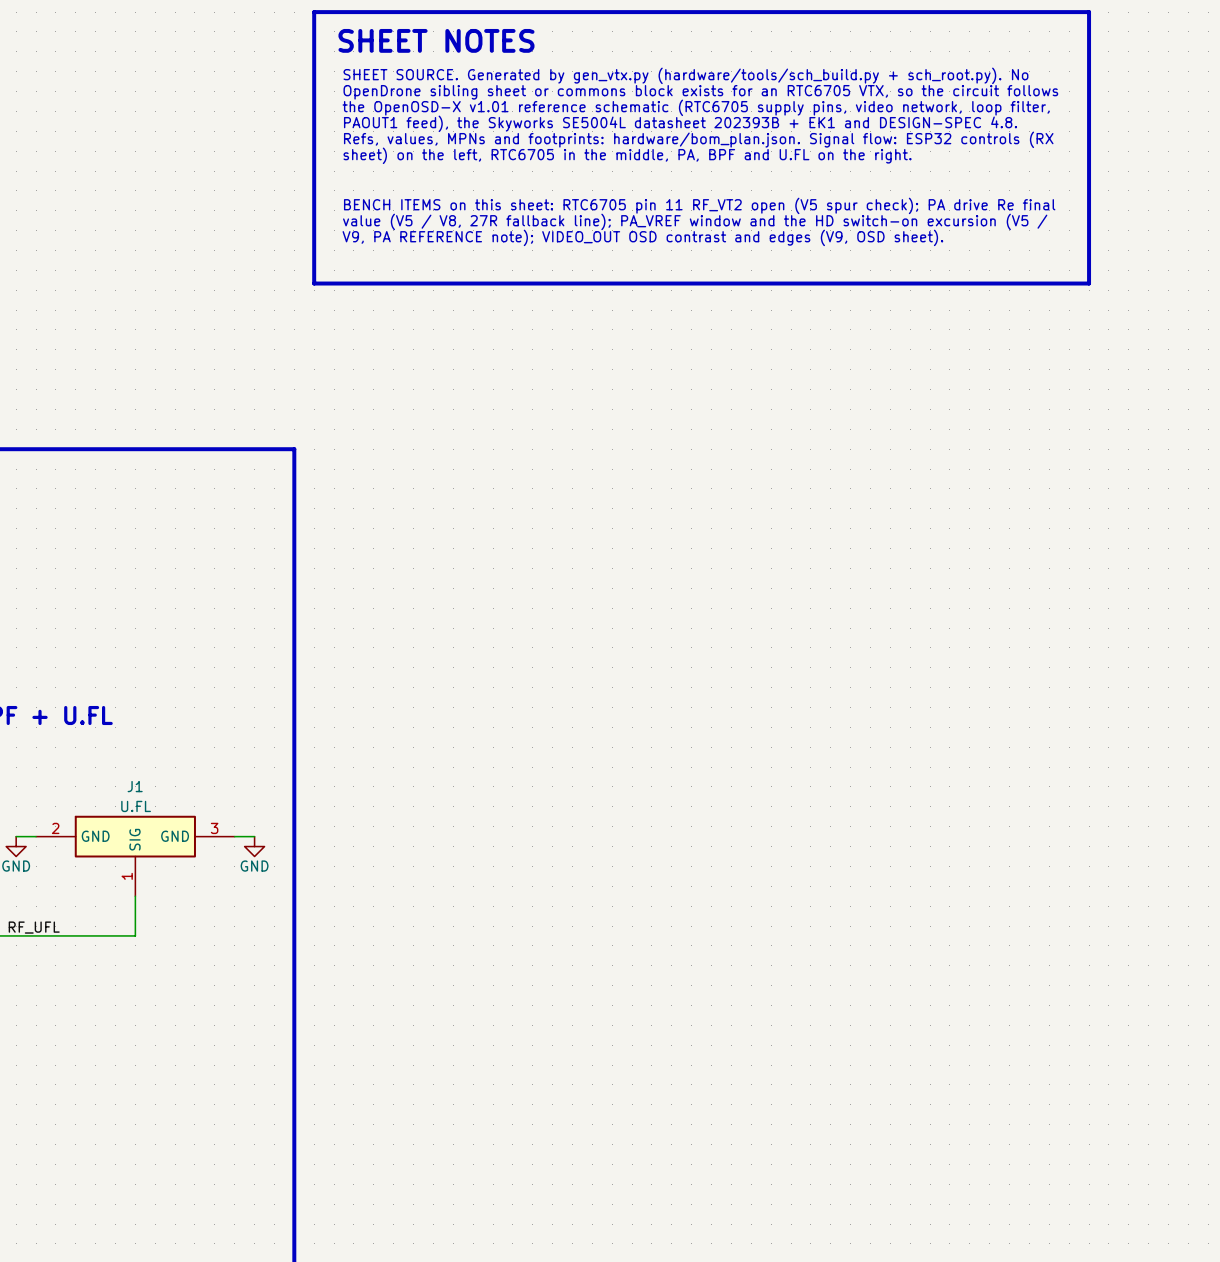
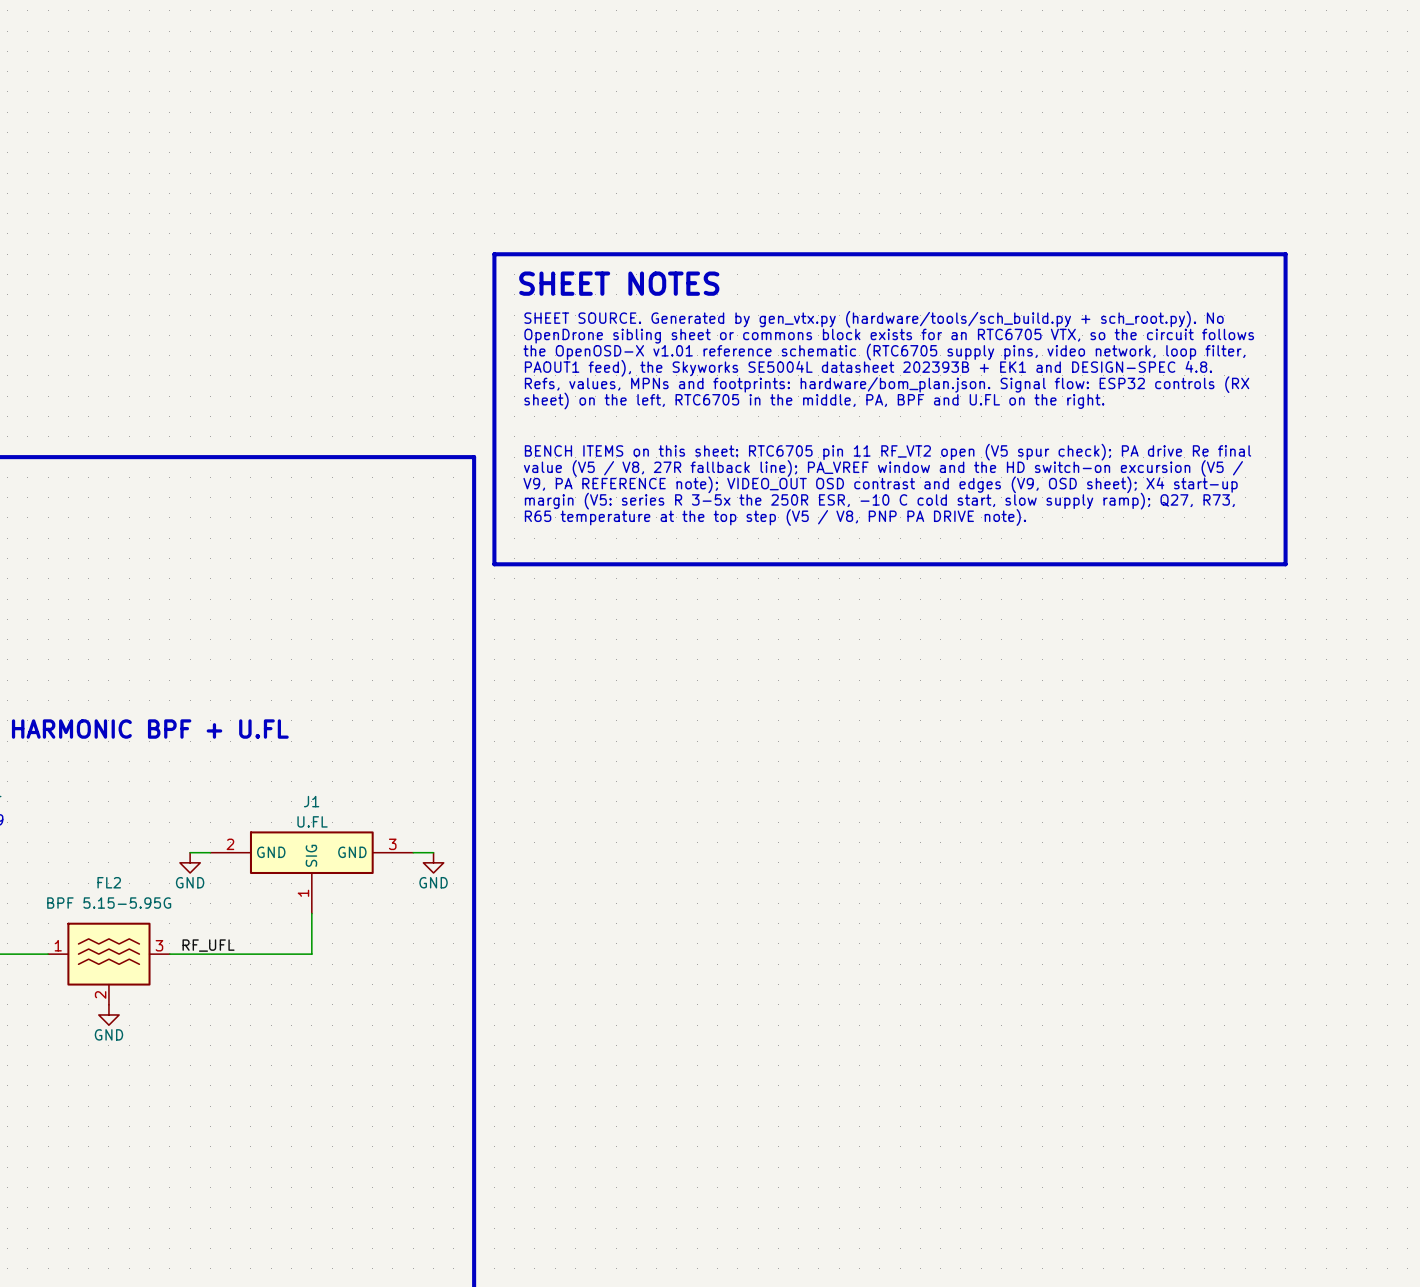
text: SHEET NOTES (436, 40) -> none
text: SHEET SOURCE. Generated by gen_vtx.py (hardware/tools/sch_build.py + sch_root.py). No (685, 75) -> none
text: OpenDrone sibling sheet or commons block exists for an RTC6705 VTX, so the circuit follows (700, 92) -> none
text: the OpenOSD-X v1.01 reference schematic (RTC6705 supply pins, video network, loop filter, (696, 107) -> none
text: PAOUT1 feed), the Skyworks SE5004L datasheet 202393B + EK1 and DESIGN-SPEC 4.8. (680, 123) -> none
text: Refs, values, MPNs and footprints: hardware/bom_plan.json. Signal flow: ESP32 controls (RX (698, 139) -> none
text: sheet) on the left, RTC6705 in the middle, PA, BPF and U.FL on the right. (627, 155) -> none
text: BENCH ITEMS on this sheet: RTC6705 pin 11 RF_VT2 open (V5 spur check); PA drive Re final (699, 205) -> none
text: value (V5 / V8, 27R fallback line); PA_VREF window and the HD switch-on excursion (V5 / (695, 221) -> none
text: V9, PA REFERENCE note); VIDEO_OUT OSD contrast and edges (V9, OSD sheet). (642, 237) -> none
line: (314, 250) (314, 12) (1089, 12) (1089, 250) -> (494, 254) (1285, 254)
text: none -> SHEET NOTES (619, 283)
line: (314, 283) (1089, 283) -> (494, 287) (494, 564) (1285, 564) (1285, 287)
text: none -> SHEET SOURCE. Generated by gen_vtx.py (hardware/tools/sch_build.py + sch_root.py). No (874, 319)
text: none -> OpenDrone sibling sheet or commons block exists for an RTC6705 VTX, so the circuit follows (889, 336)
text: none -> the OpenOSD-X v1.01 reference schematic (RTC6705 supply pins, video network, loop filter, (884, 351)
text: none -> PAOUT1 feed), the Skyworks SE5004L datasheet 202393B + EK1 and DESIGN-SPEC 4.8. (868, 368)
text: none -> Refs, values, MPNs and footprints: hardware/bom_plan.json. Signal flow: ESP32 controls (RX (887, 384)
text: none -> sheet) on the left, RTC6705 in the middle, PA, BPF and U.FL on the right. (814, 400)
text: none -> BENCH ITEMS on this sheet: RTC6705 pin 11 RF_VT2 open (V5 spur check); PA drive Re final (888, 452)
text: none -> value (V5 / V8, 27R fallback line); PA_VREF window and the HD switch-on excursion (V5 / (883, 468)
text: none -> V9, PA REFERENCE note); VIDEO_OUT OSD contrast and edges (V9, OSD sheet); X4 start-up (880, 484)
text: none -> margin (V5: series R 3-5x the 250R ESR, -10 C cold start, slow supply ramp); Q27, R73, (879, 501)
text: none -> R65 temperature at the top step (V5 / V8, PNP PA DRIVE note). (775, 517)

